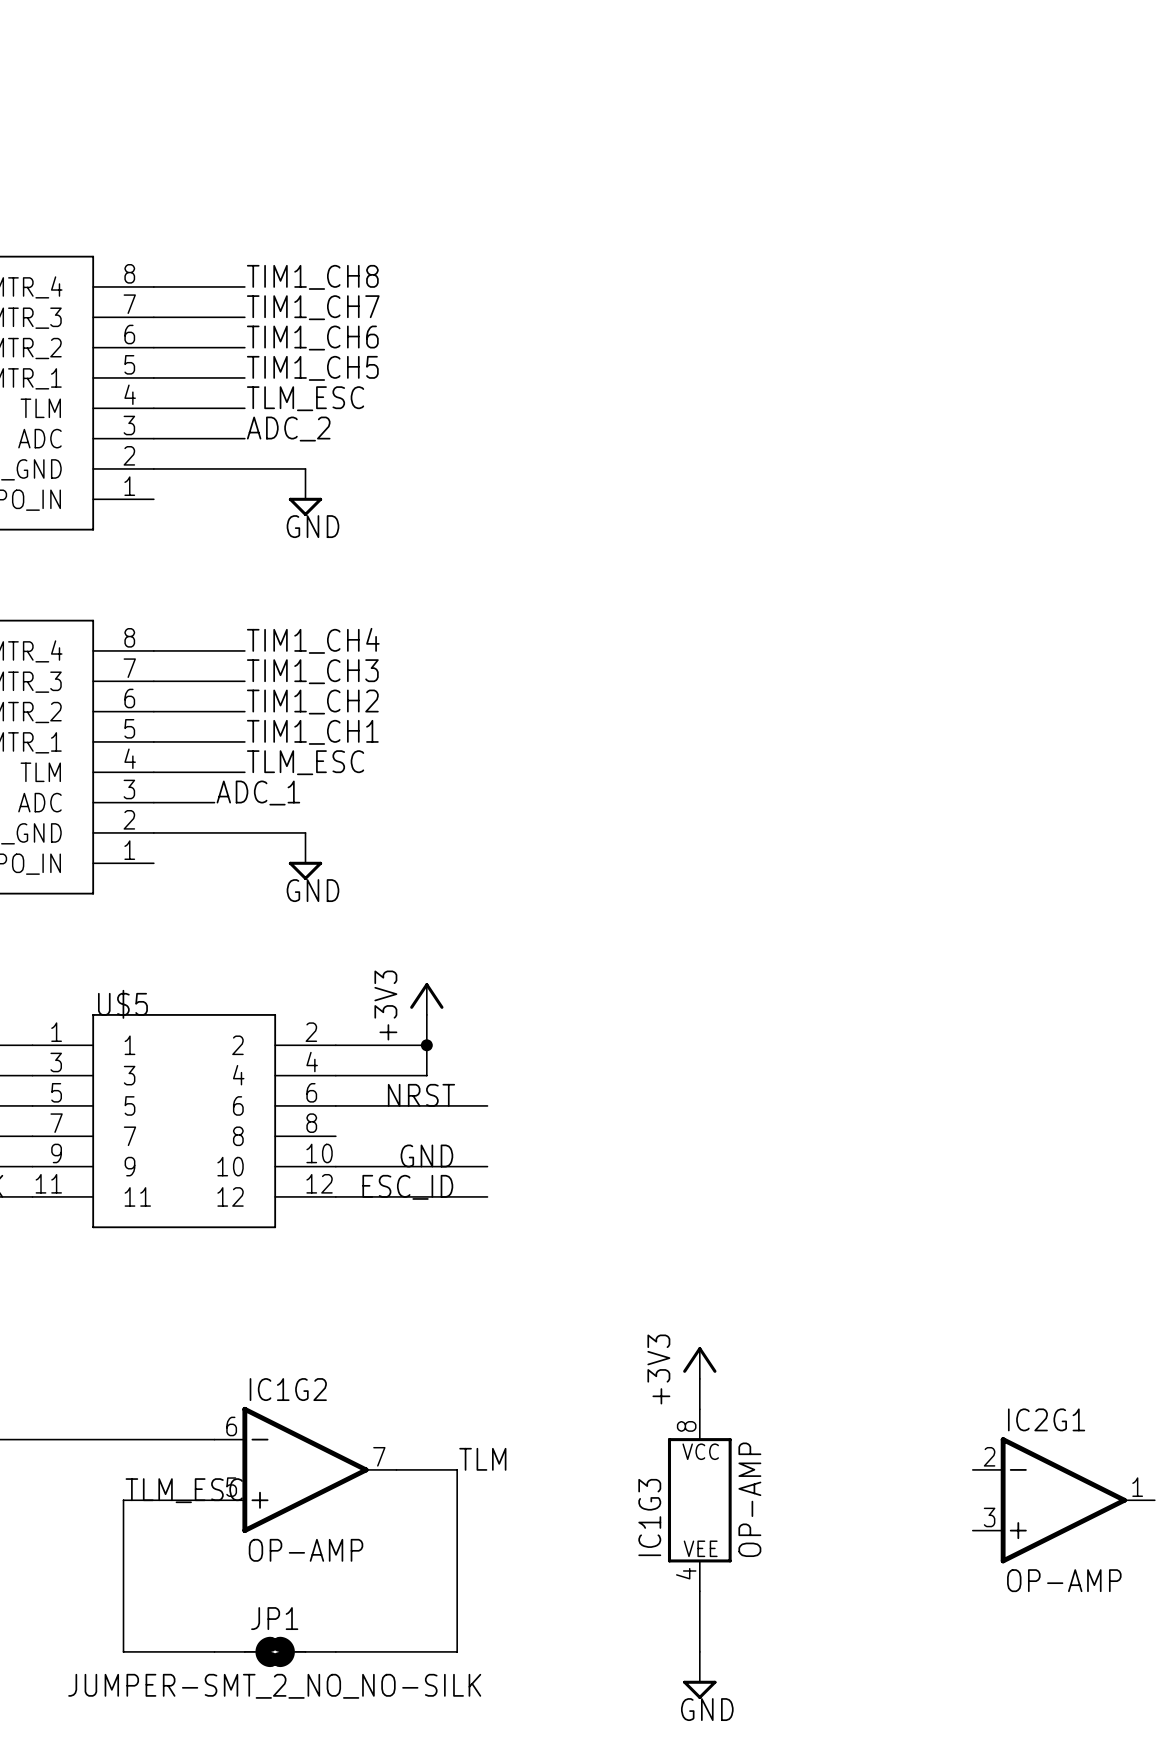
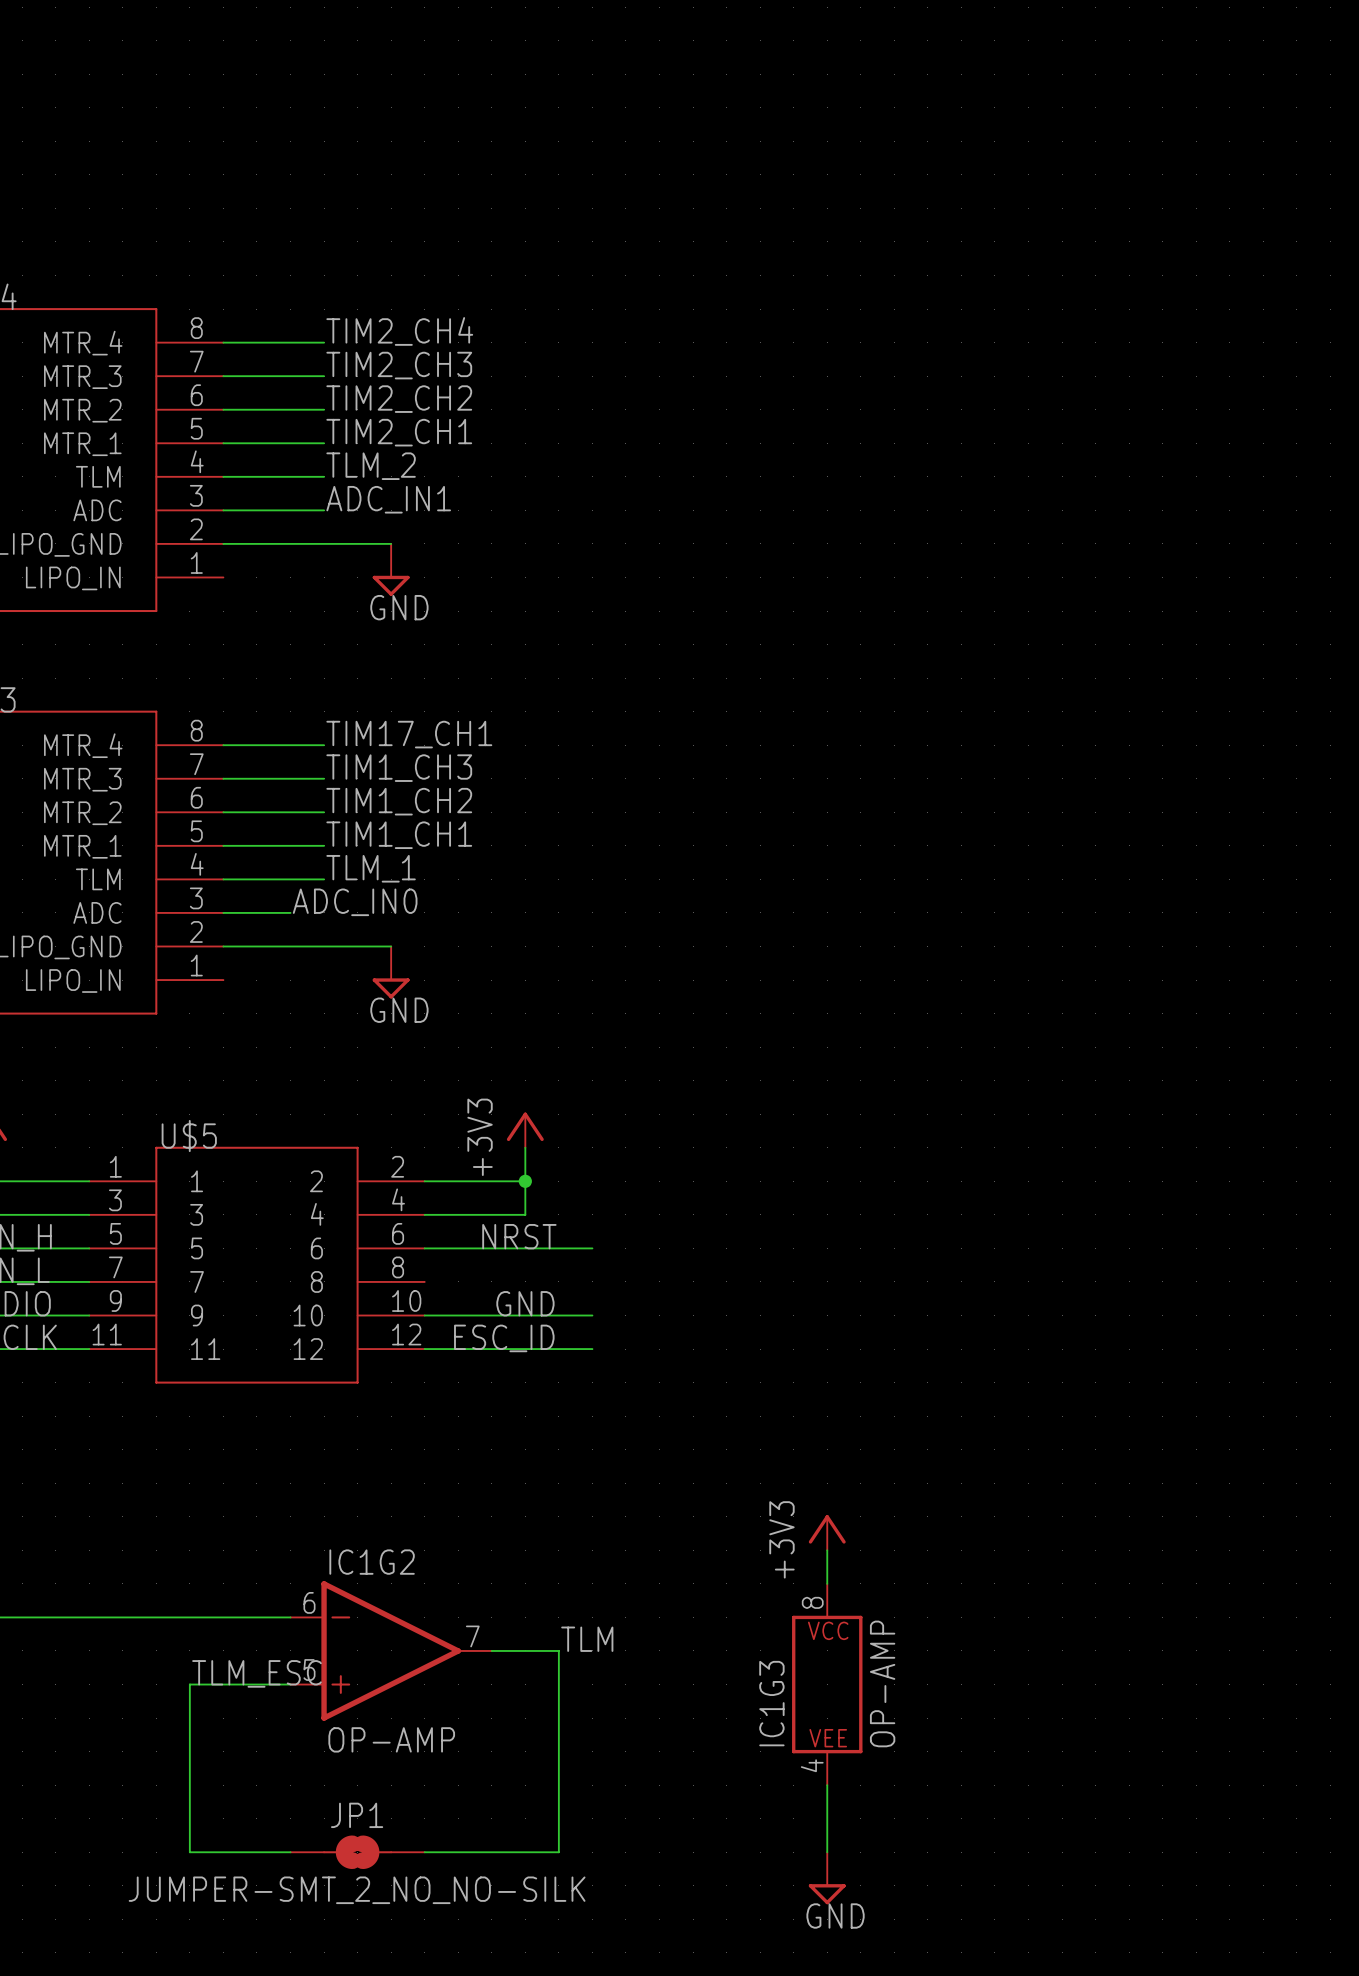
label: TIM1_CH8 (312, 277) -> TIM2_CH4 (399, 331)
label: TIM1_CH7 (313, 307) -> TIM2_CH3 (399, 365)
label: TIM1_CH6 (312, 338) -> TIM2_CH2 (399, 399)
label: TIM1_CH5 (312, 368) -> TIM2_CH1 (399, 432)
label: TLM_ESC (305, 398) -> TLM_2 (371, 466)
label: ADC_2 (288, 429) -> ADC_IN1 (388, 499)
label: TIM1_CH4 (313, 640) -> TIM17_CH1 (409, 734)
label: TLM_ESC (305, 762) -> TLM_1 (371, 868)
label: ADC_1 (258, 793) -> ADC_IN0 (355, 902)
IC2G1: OP-AMP (1063, 1500) -> none

